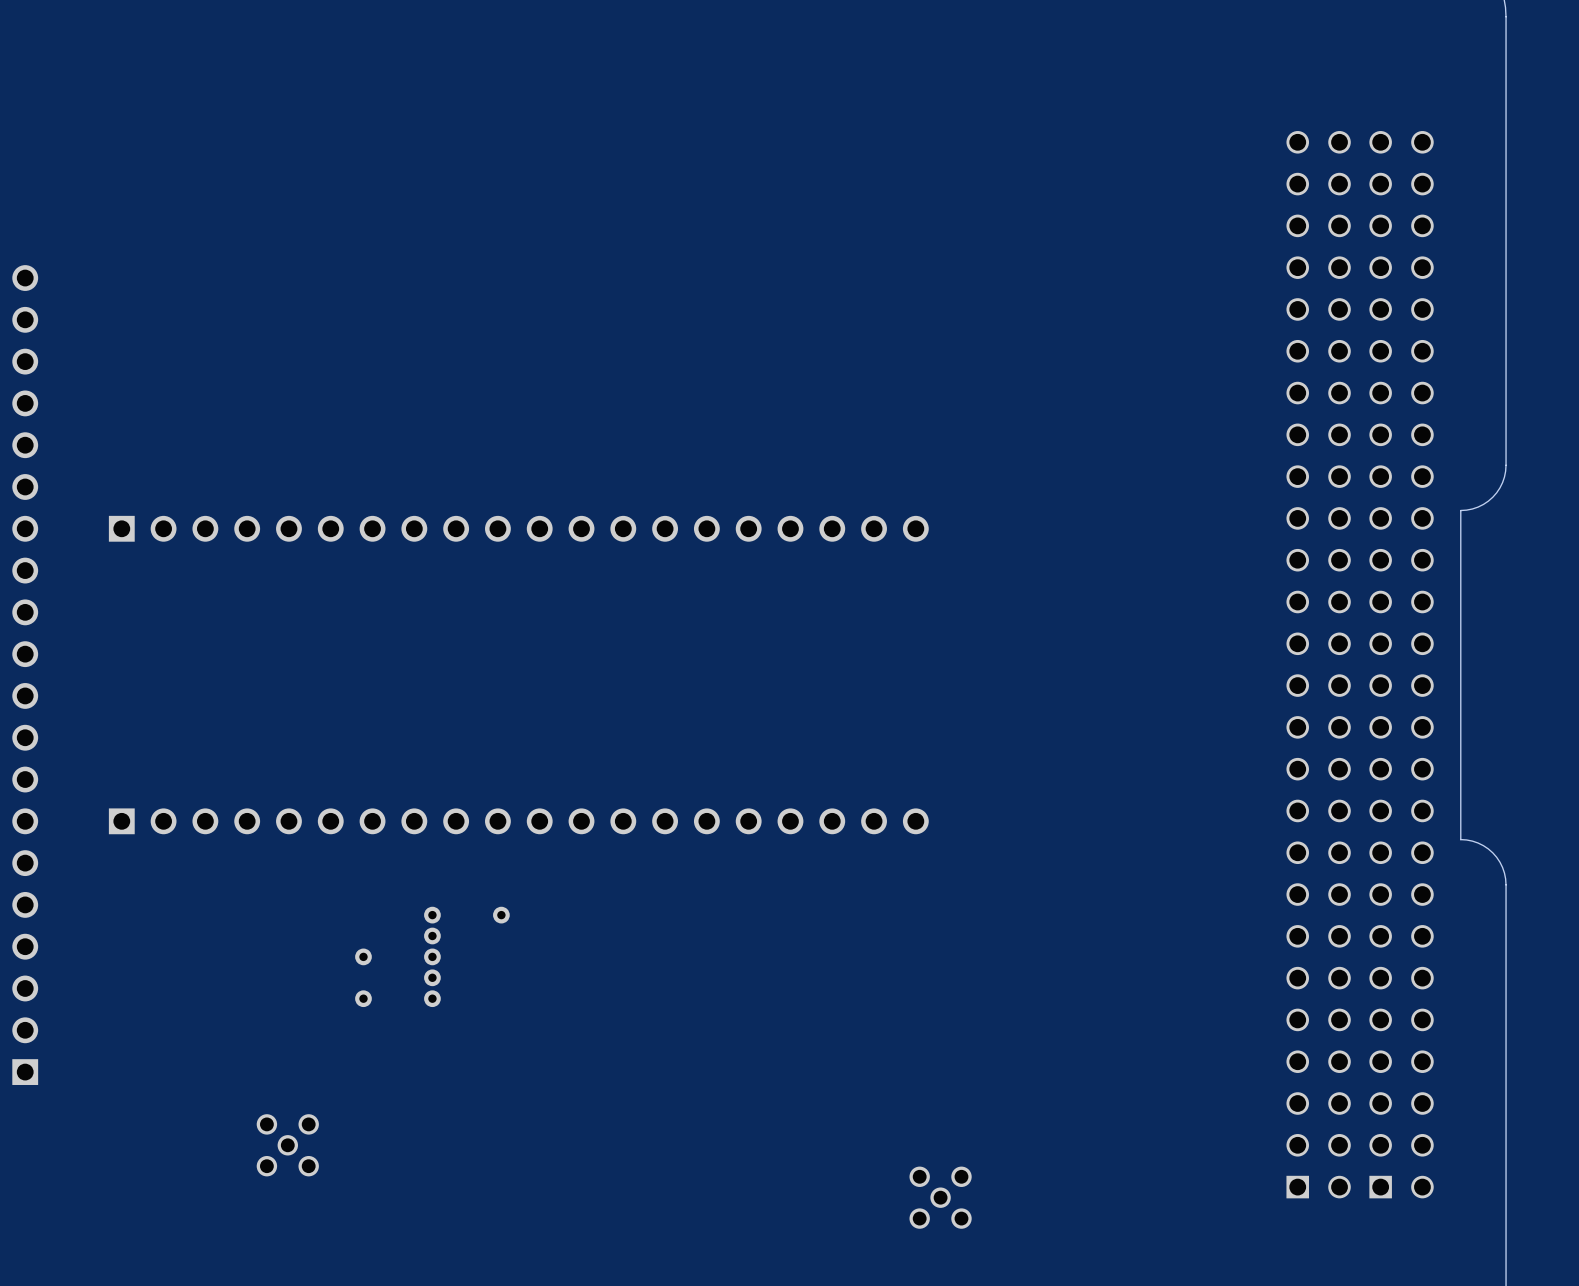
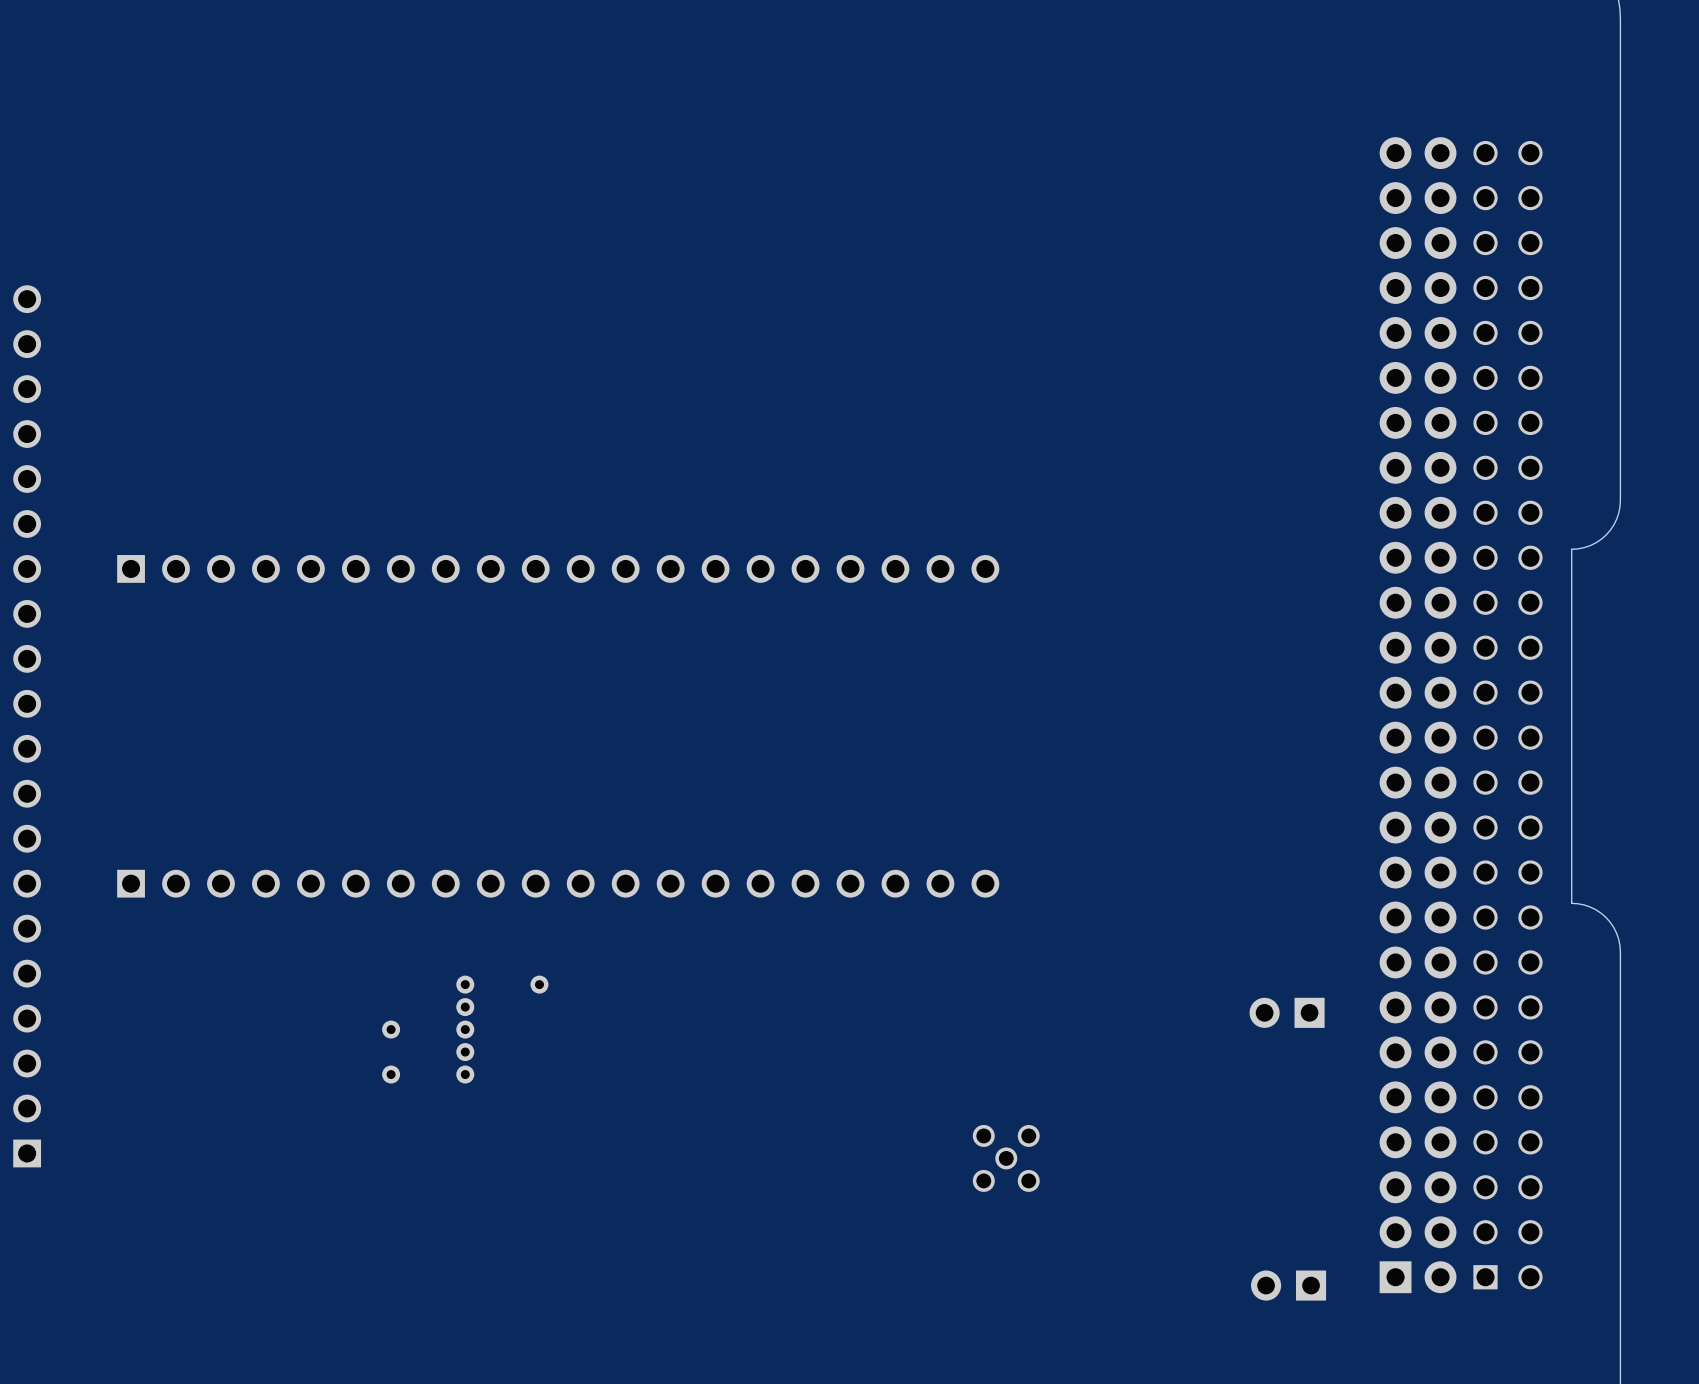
part footprint: [1286, 131, 1351, 1199] -> [1379, 137, 1457, 1294]
part: none -> (1287, 1012)
part: (287, 1145) -> none
part: none -> (1288, 1285)
part position: (940, 1197) -> (1006, 1158)

